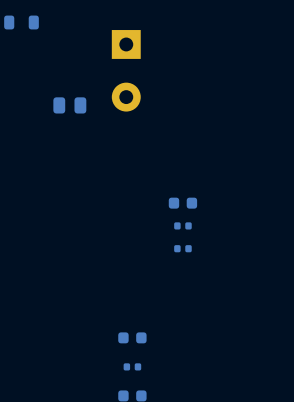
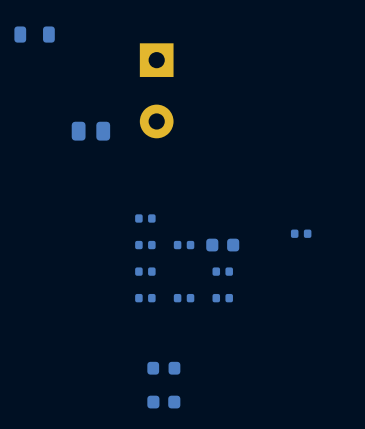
part: none -> (145, 218)
part: none -> (301, 233)
part: none -> (145, 245)
part: none -> (184, 245)
part: none -> (145, 271)
part: none -> (145, 298)
part: none -> (184, 298)
part: none -> (163, 368)

